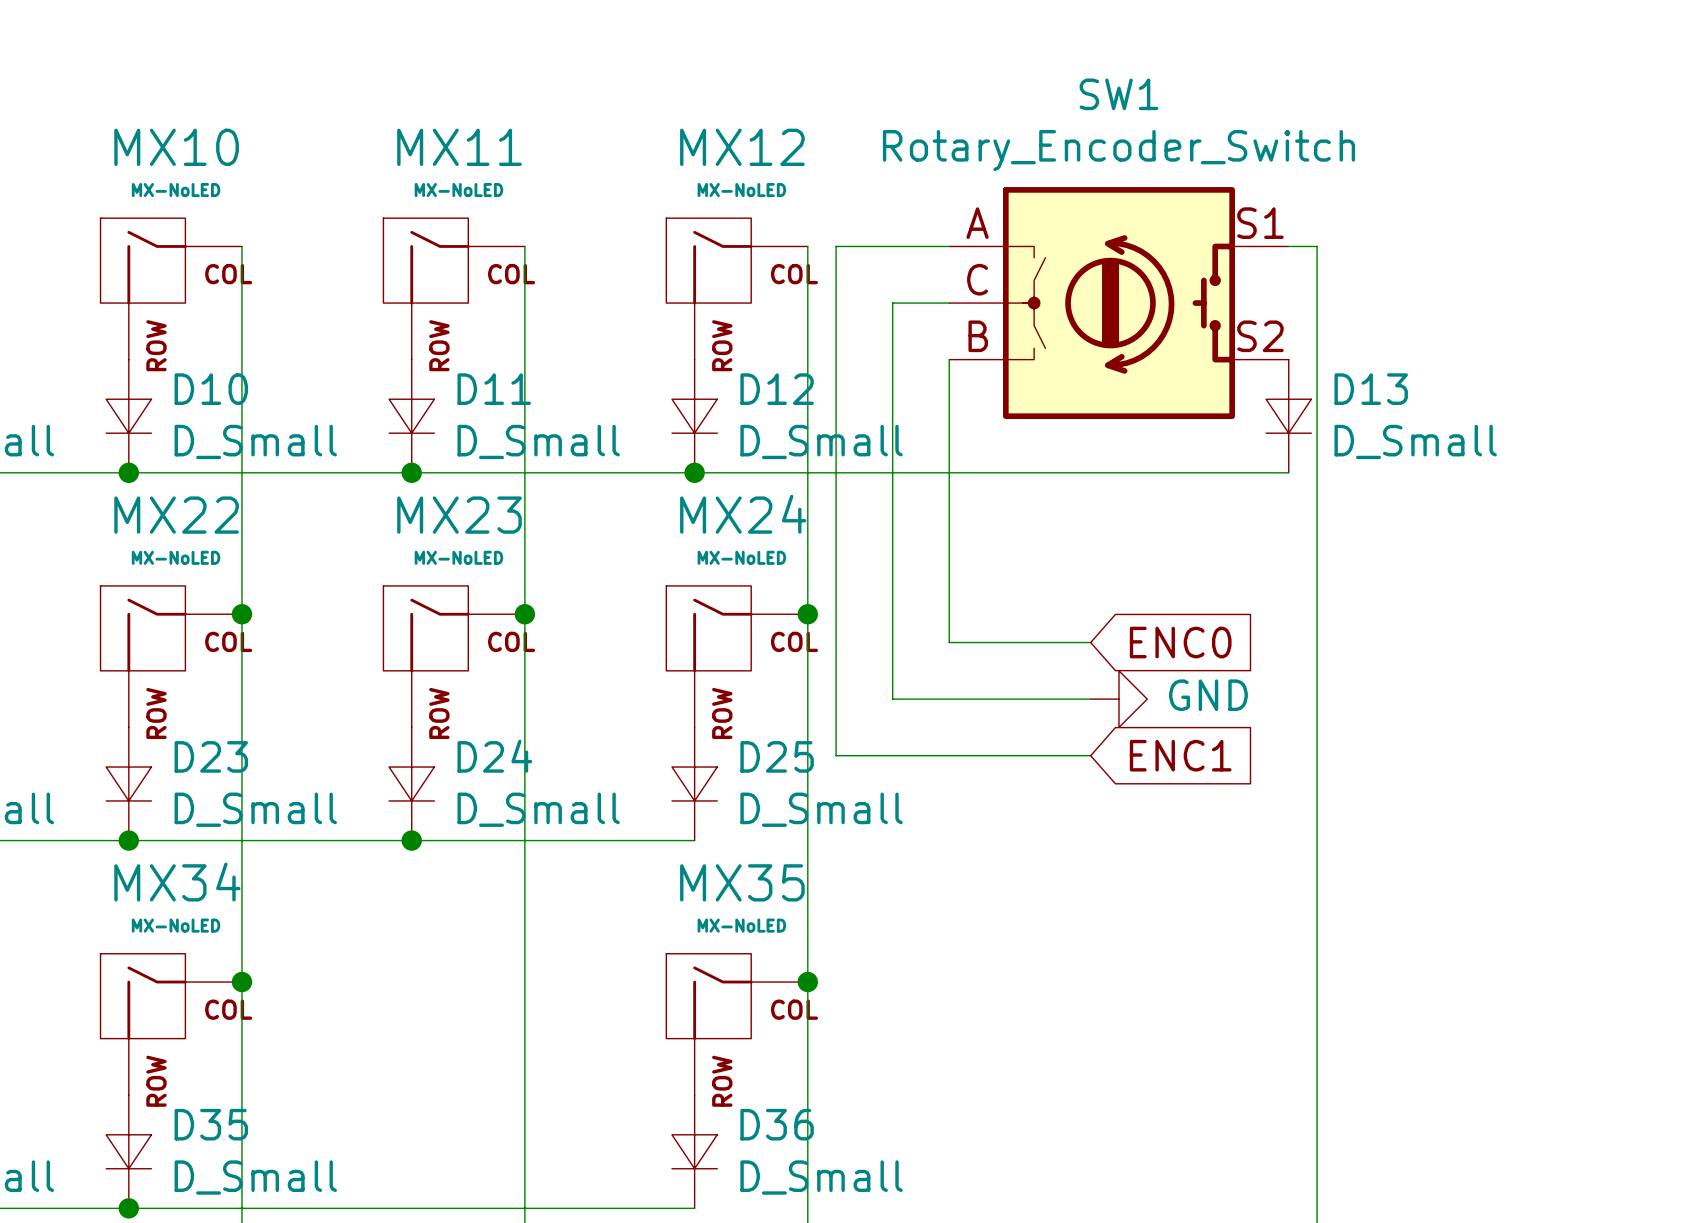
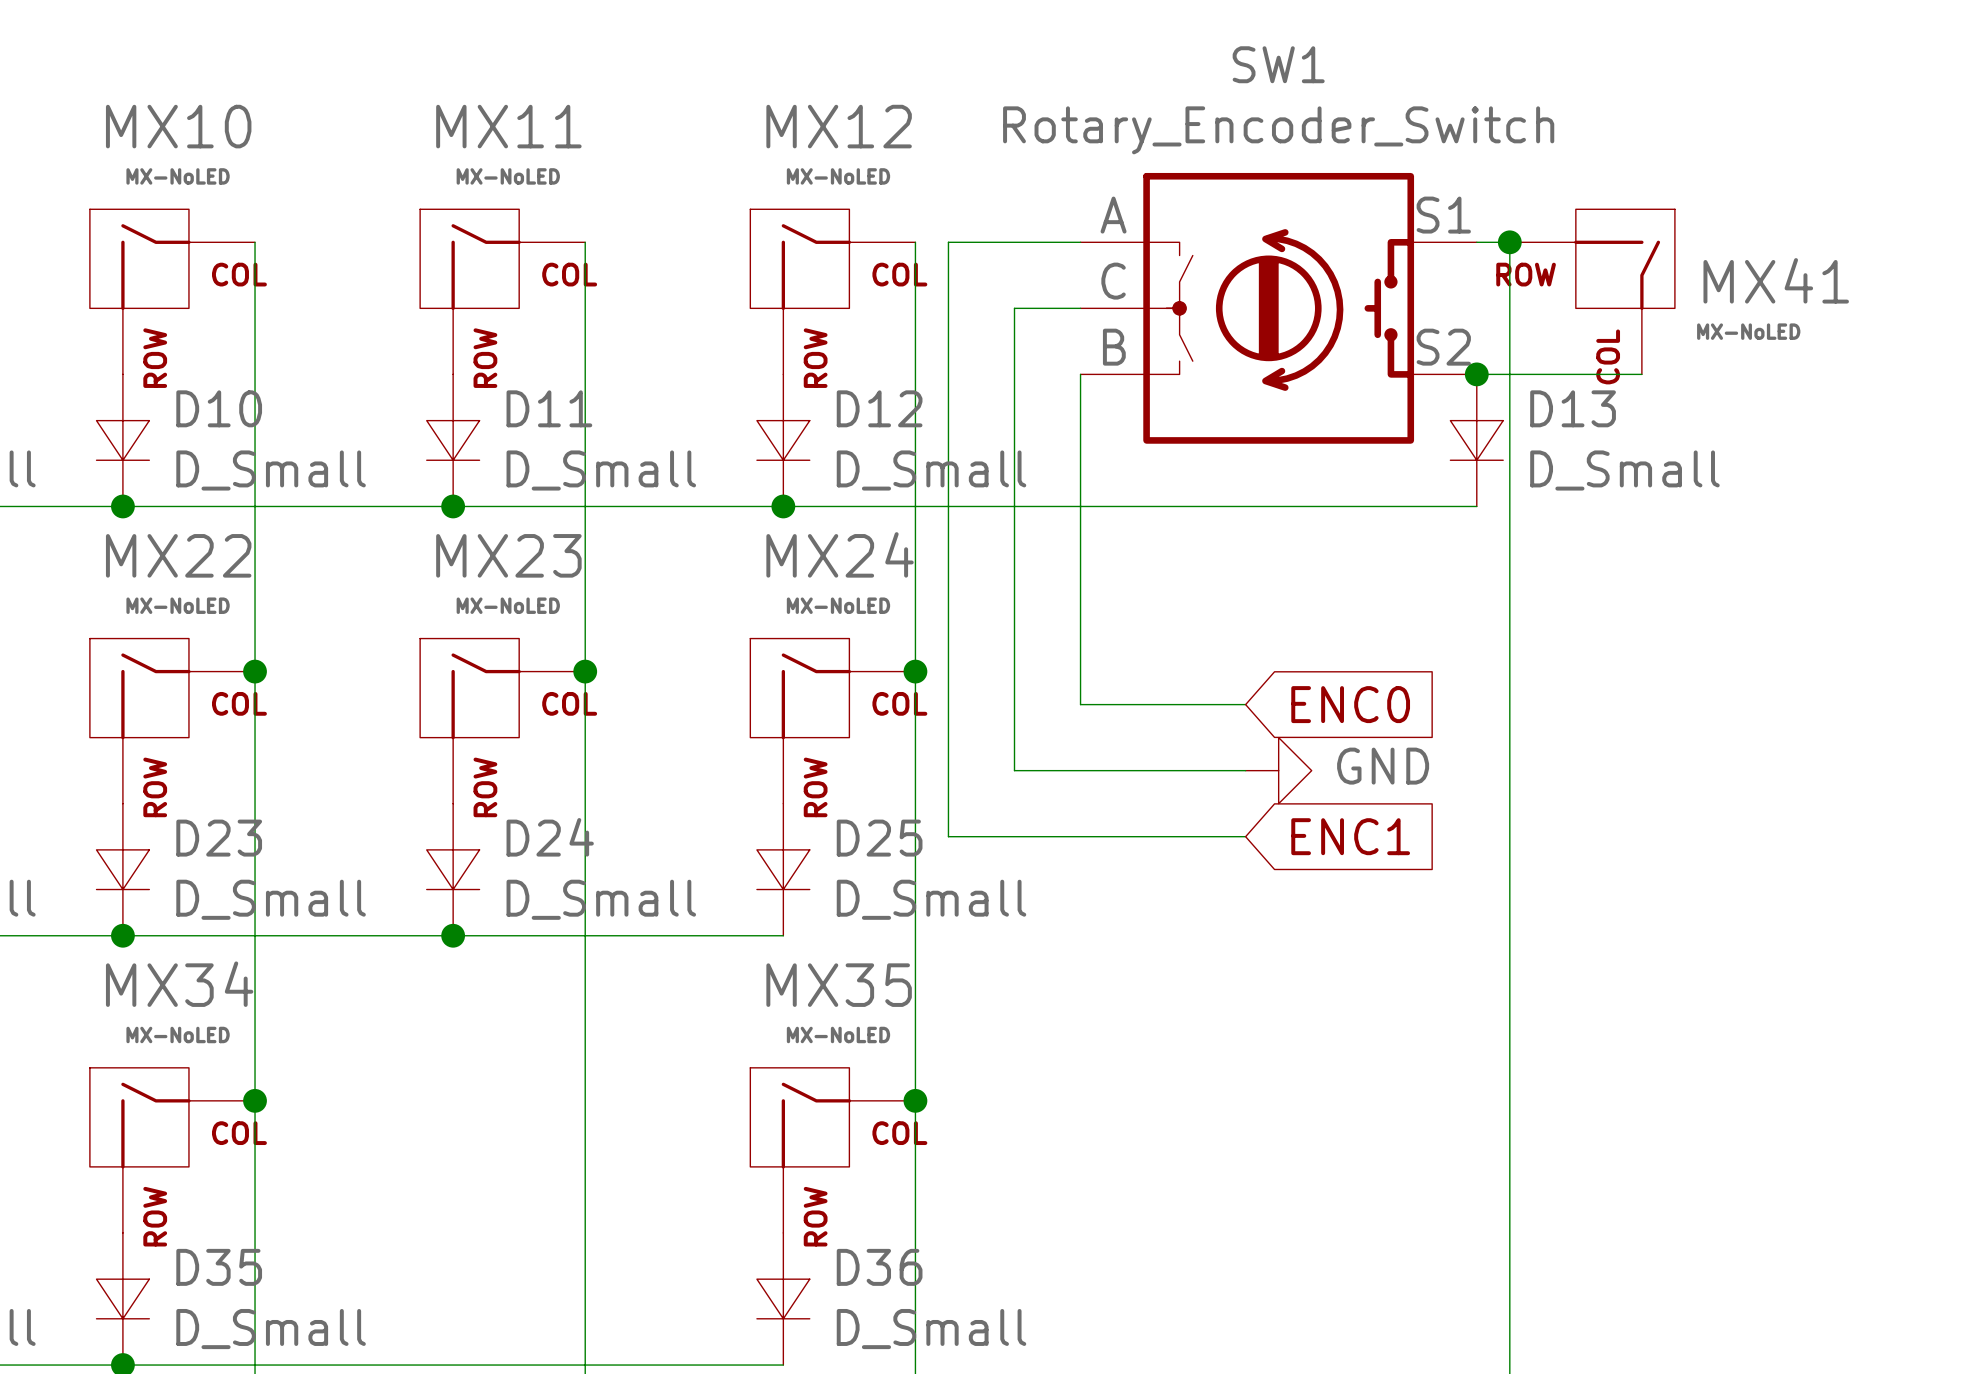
junction: none -> (1509, 242)
MX41: none -> MX-NoLED (1592, 291)
wire: none -> (1476, 374) (1641, 374)
junction: none -> (1476, 374)

